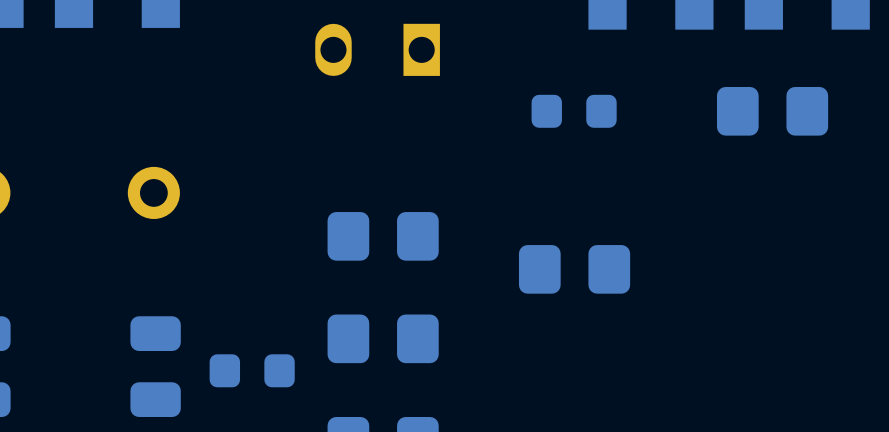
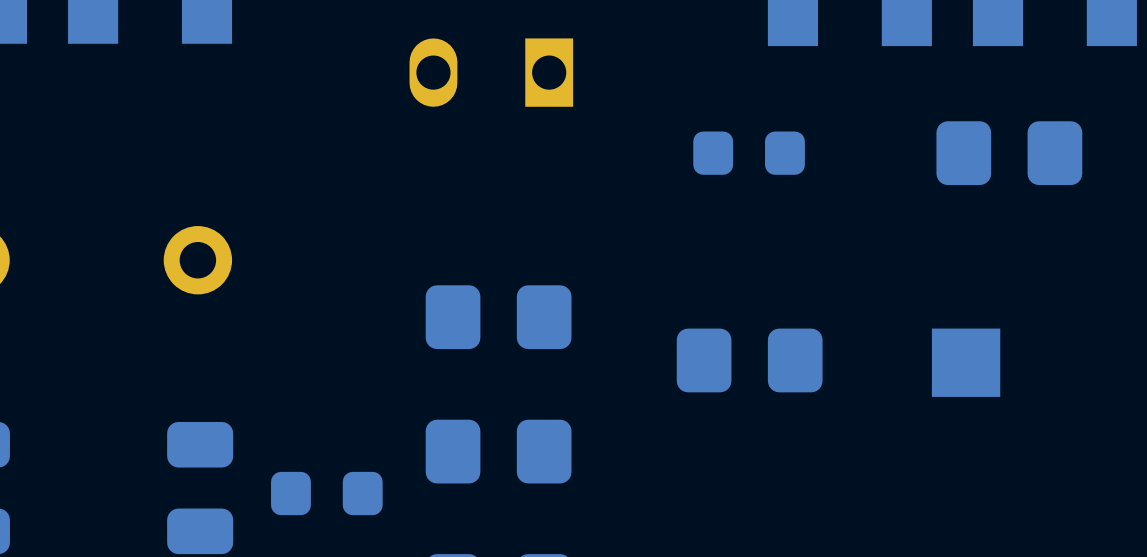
part: none -> (966, 362)

